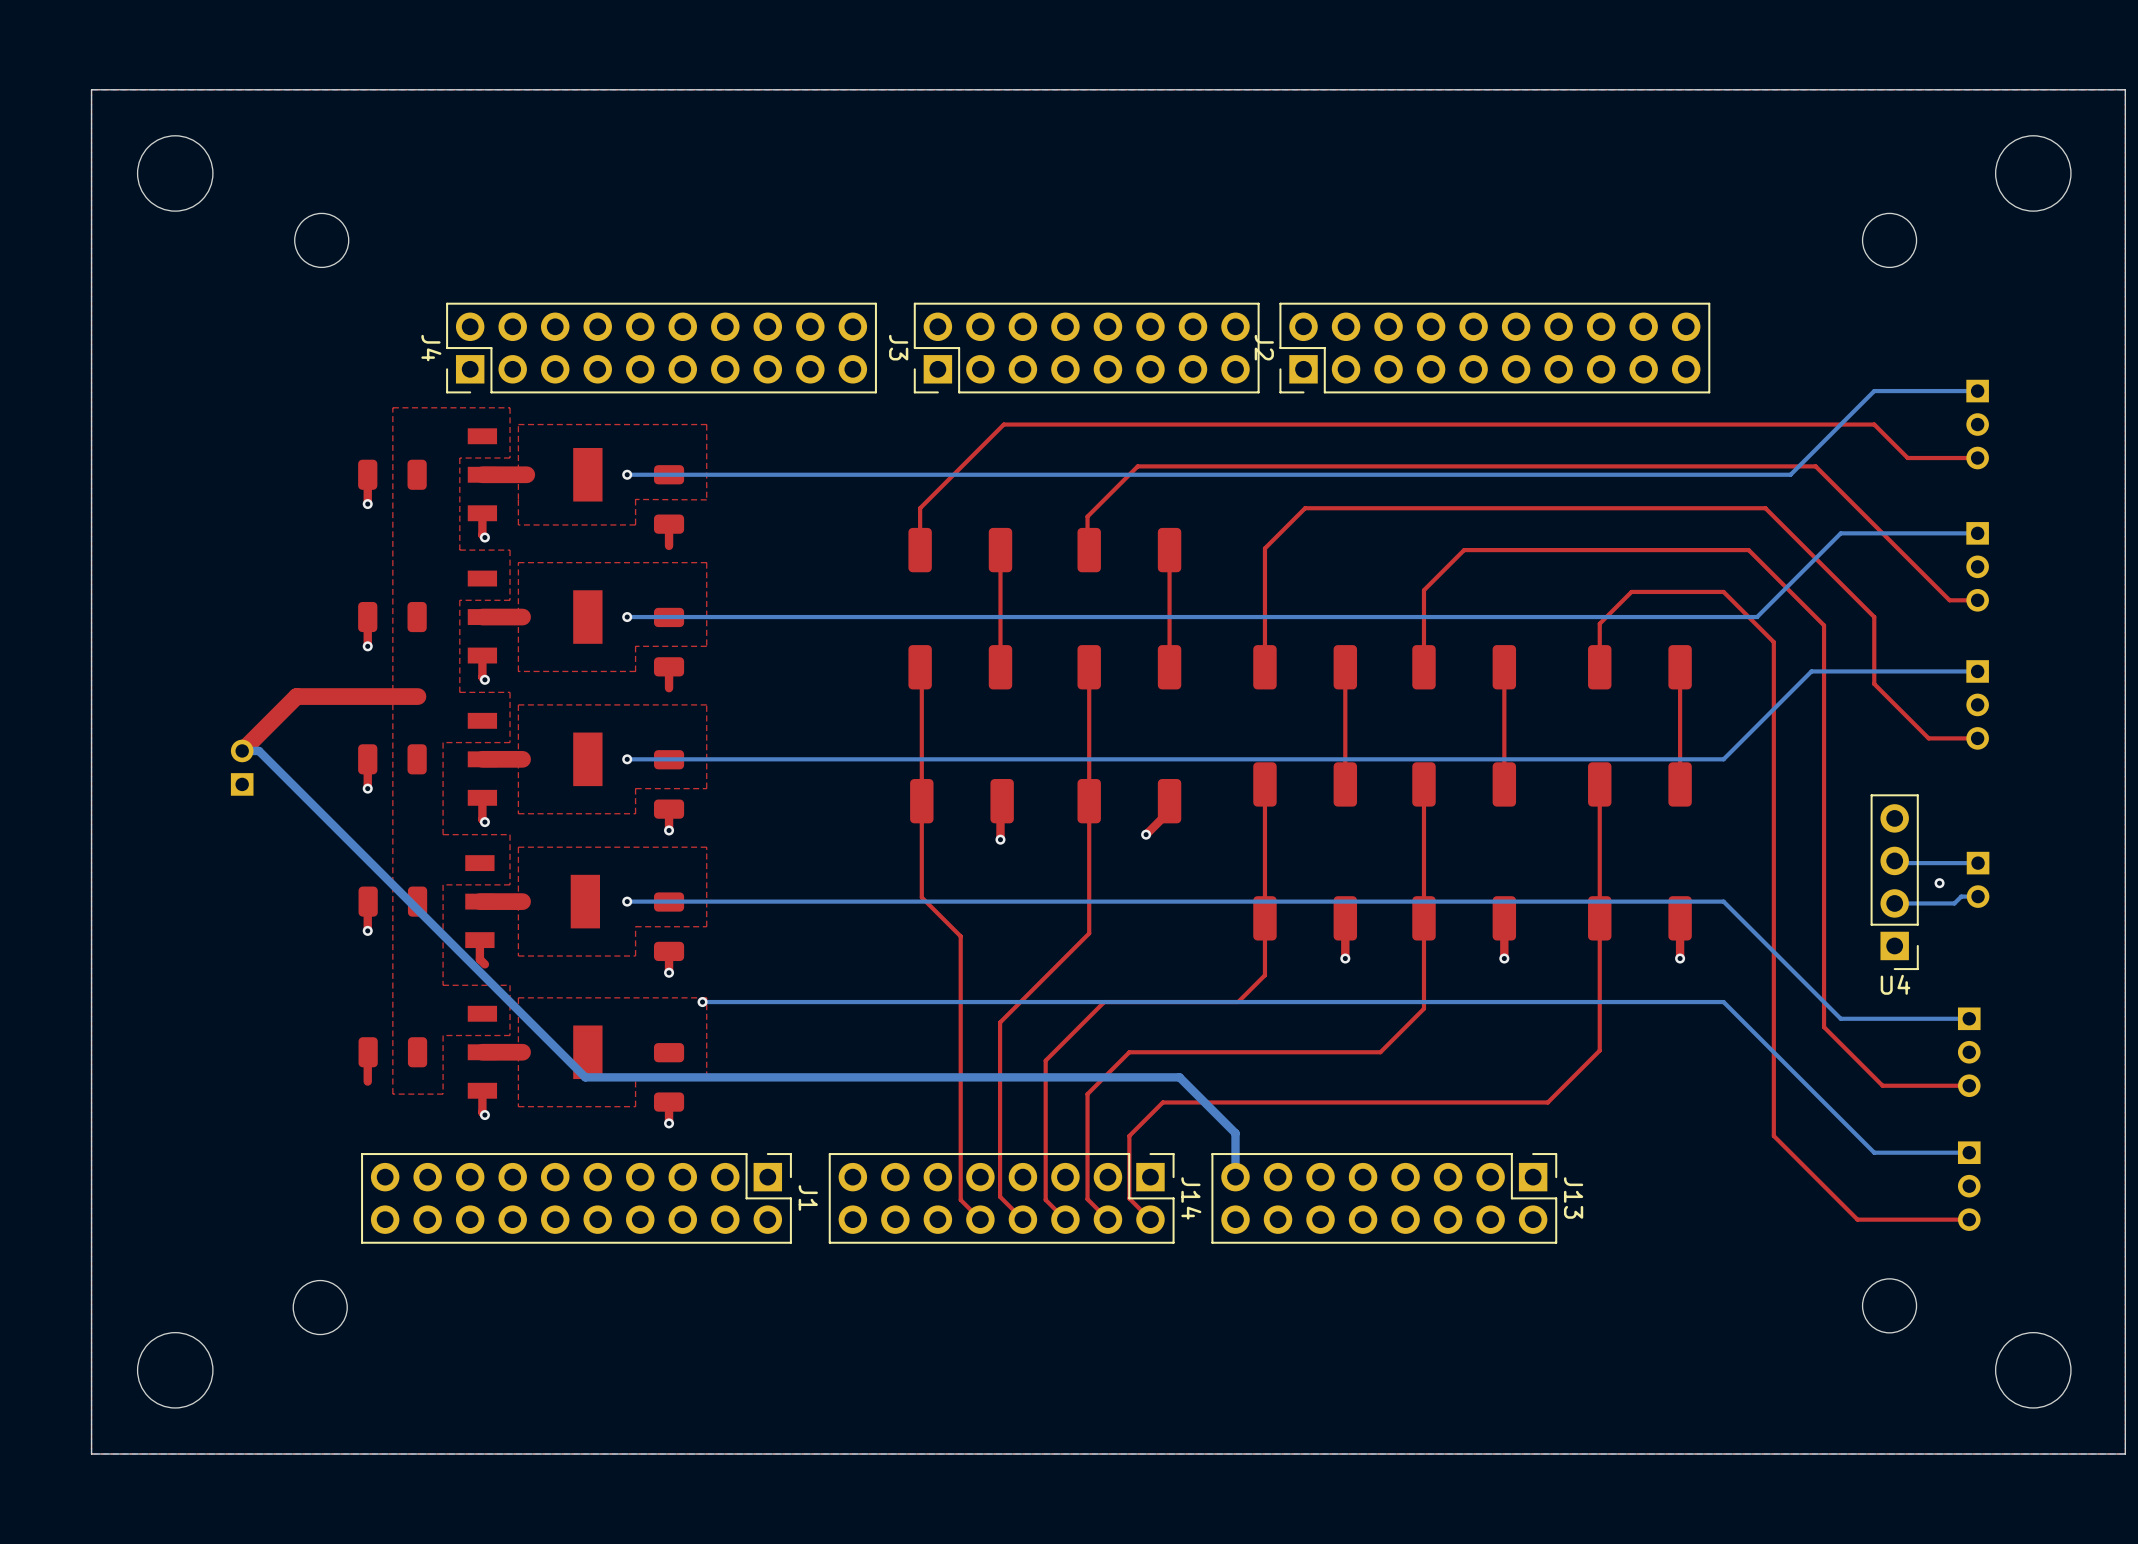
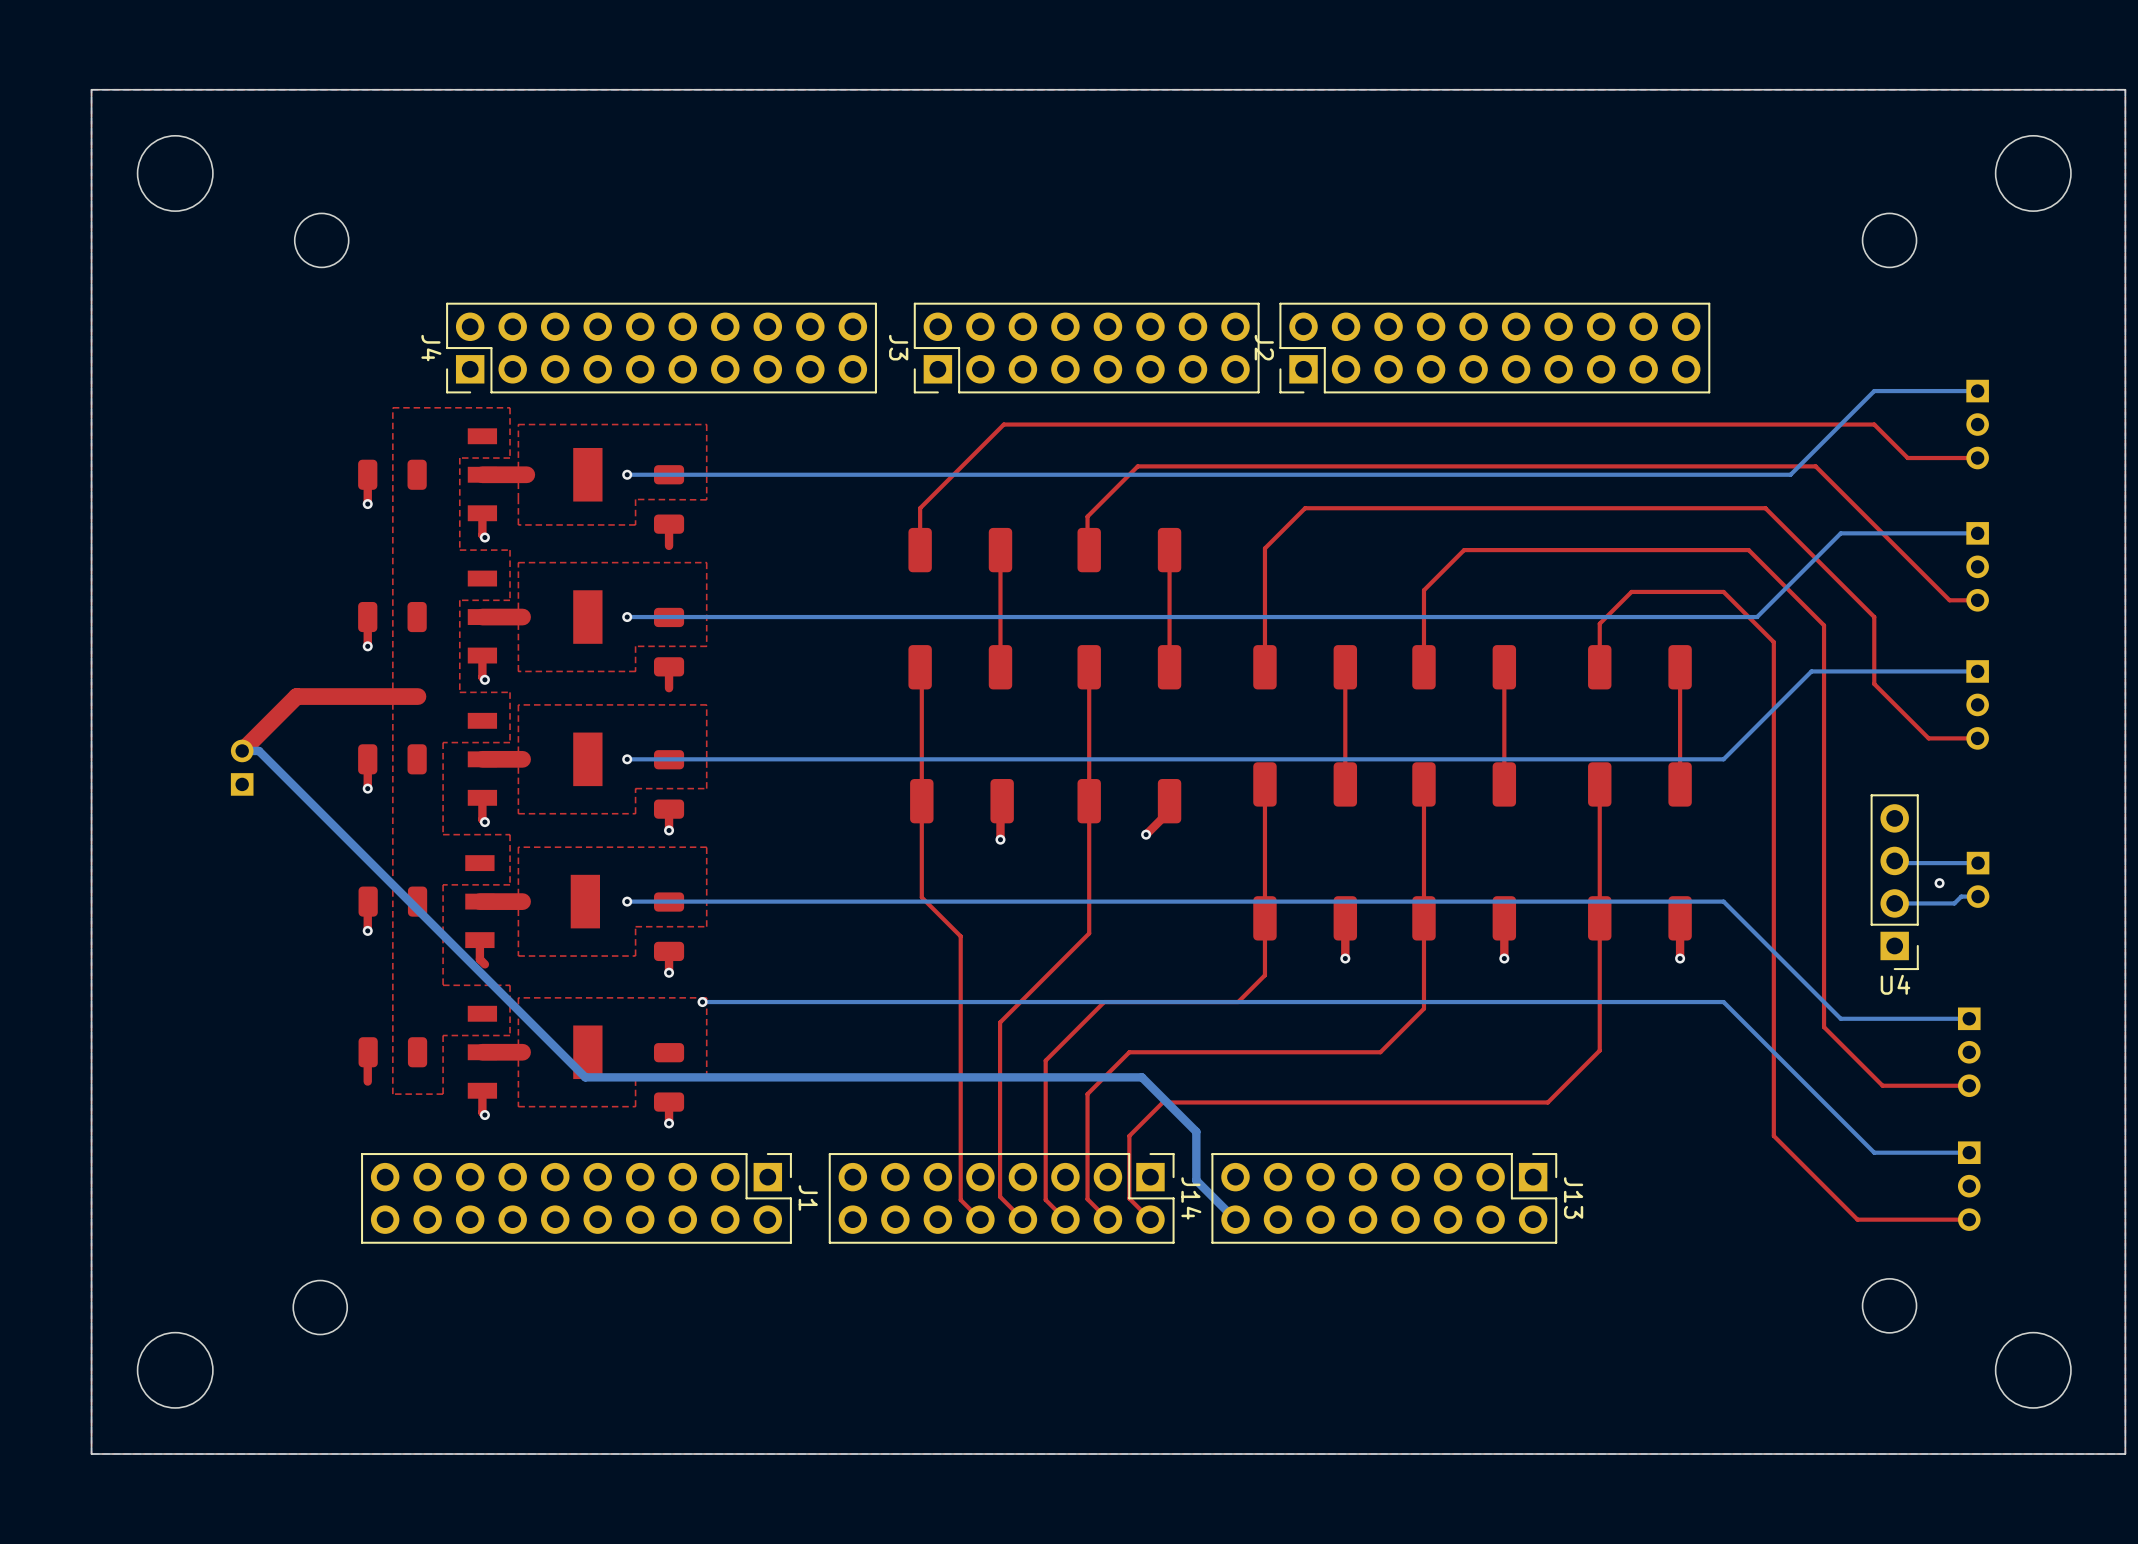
bottom track: (1141, 1077) (1179, 1077) (1235, 1133) (1235, 1177) -> (1141, 1077) (1196, 1131) (1196, 1180) (1235, 1219)

